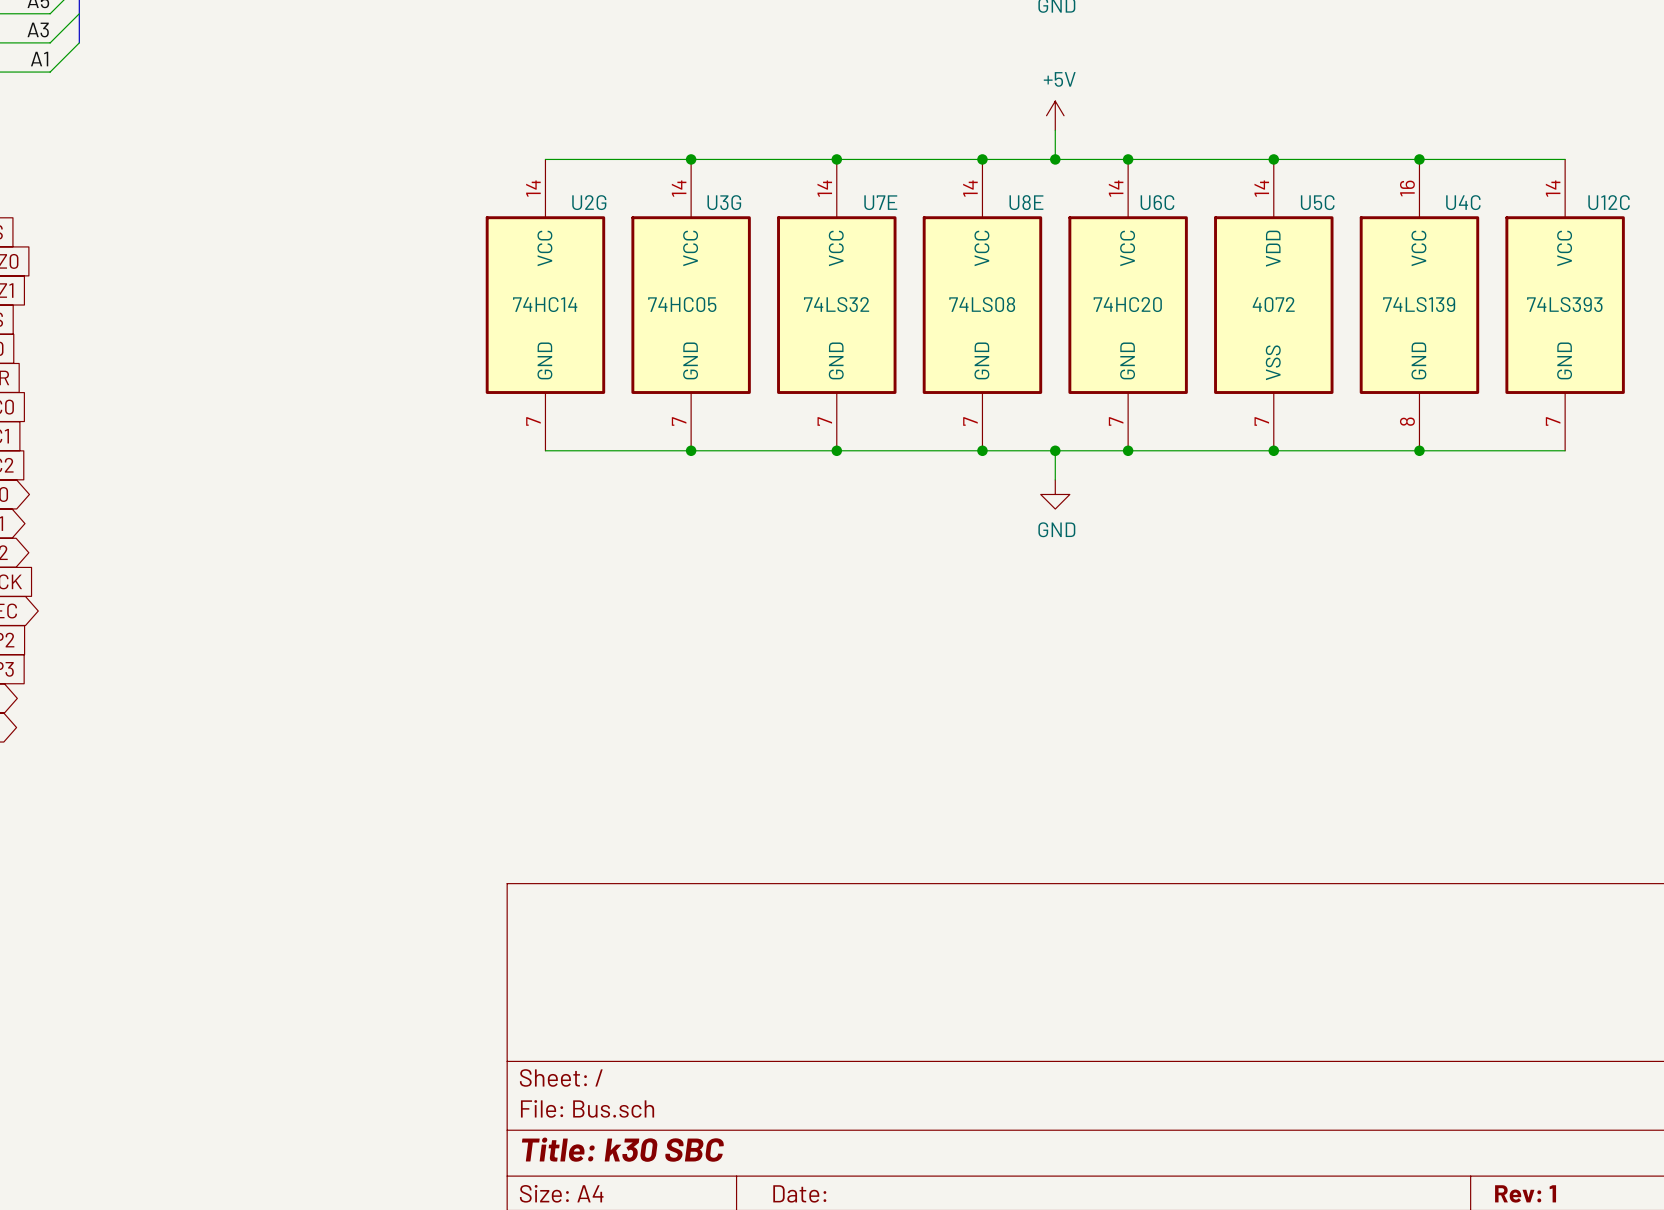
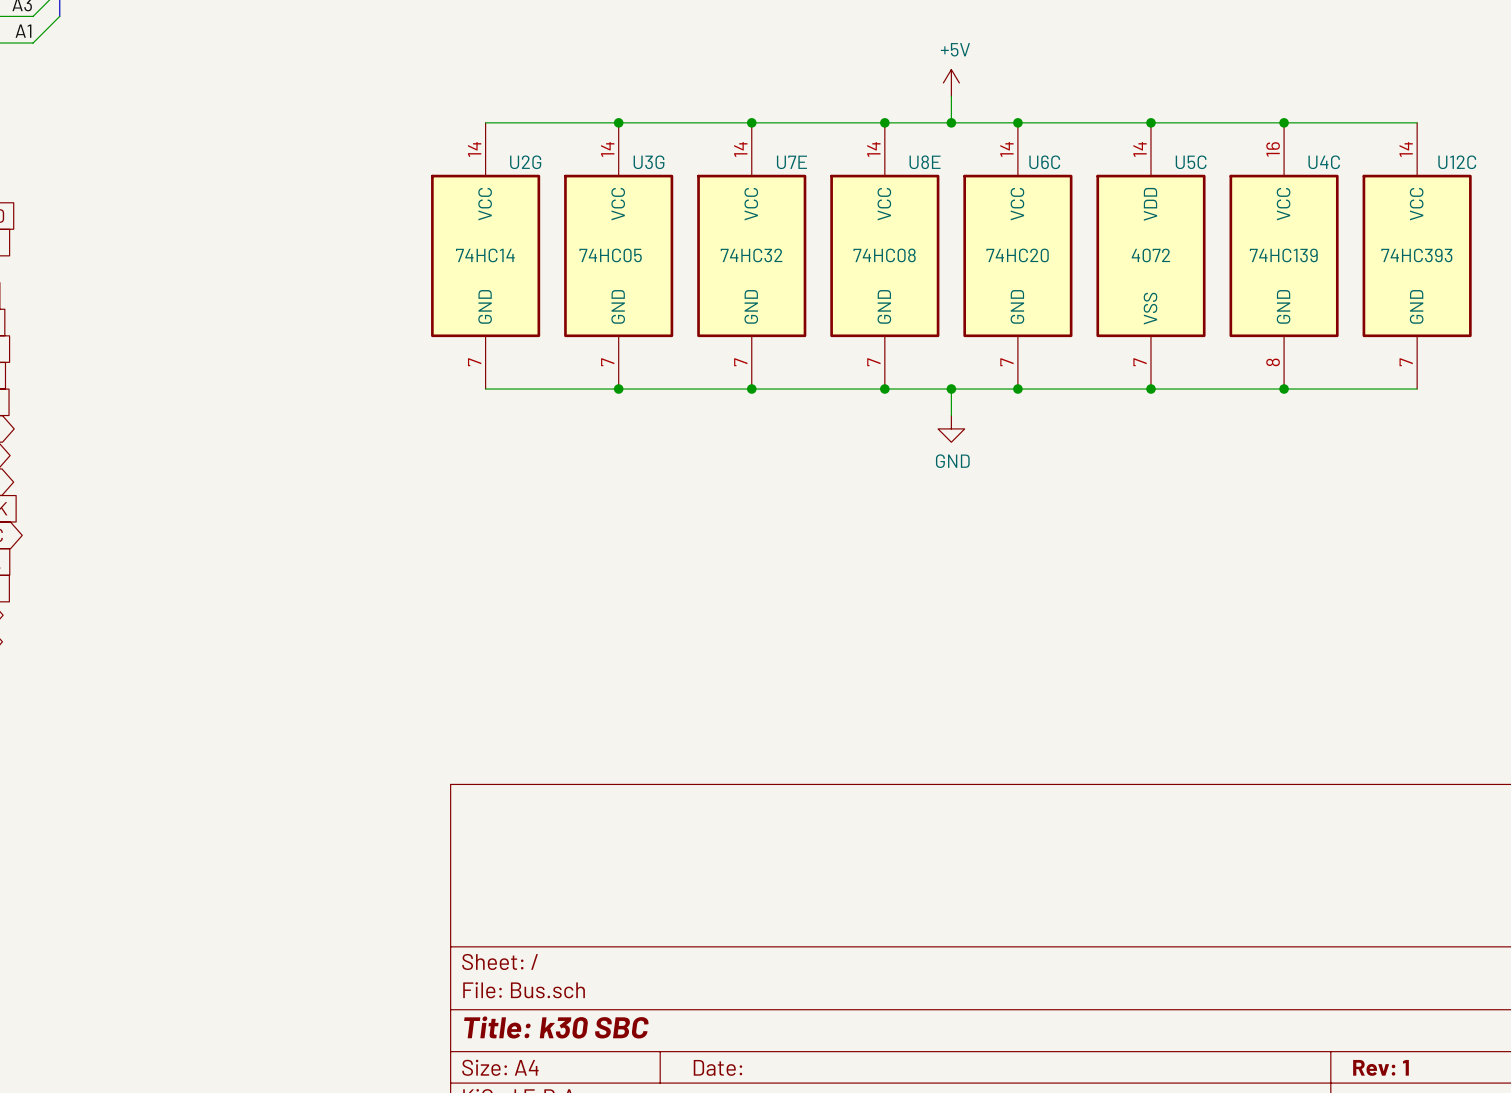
U7E value: 74LS32 (836, 304) -> 74HC32 (751, 255)
U8E value: 74LS08 (982, 304) -> 74HC08 (884, 255)
U4C value: 74LS139 (1419, 304) -> 74HC139 (1283, 255)
U12C value: 74LS393 (1564, 304) -> 74HC393 (1416, 255)

